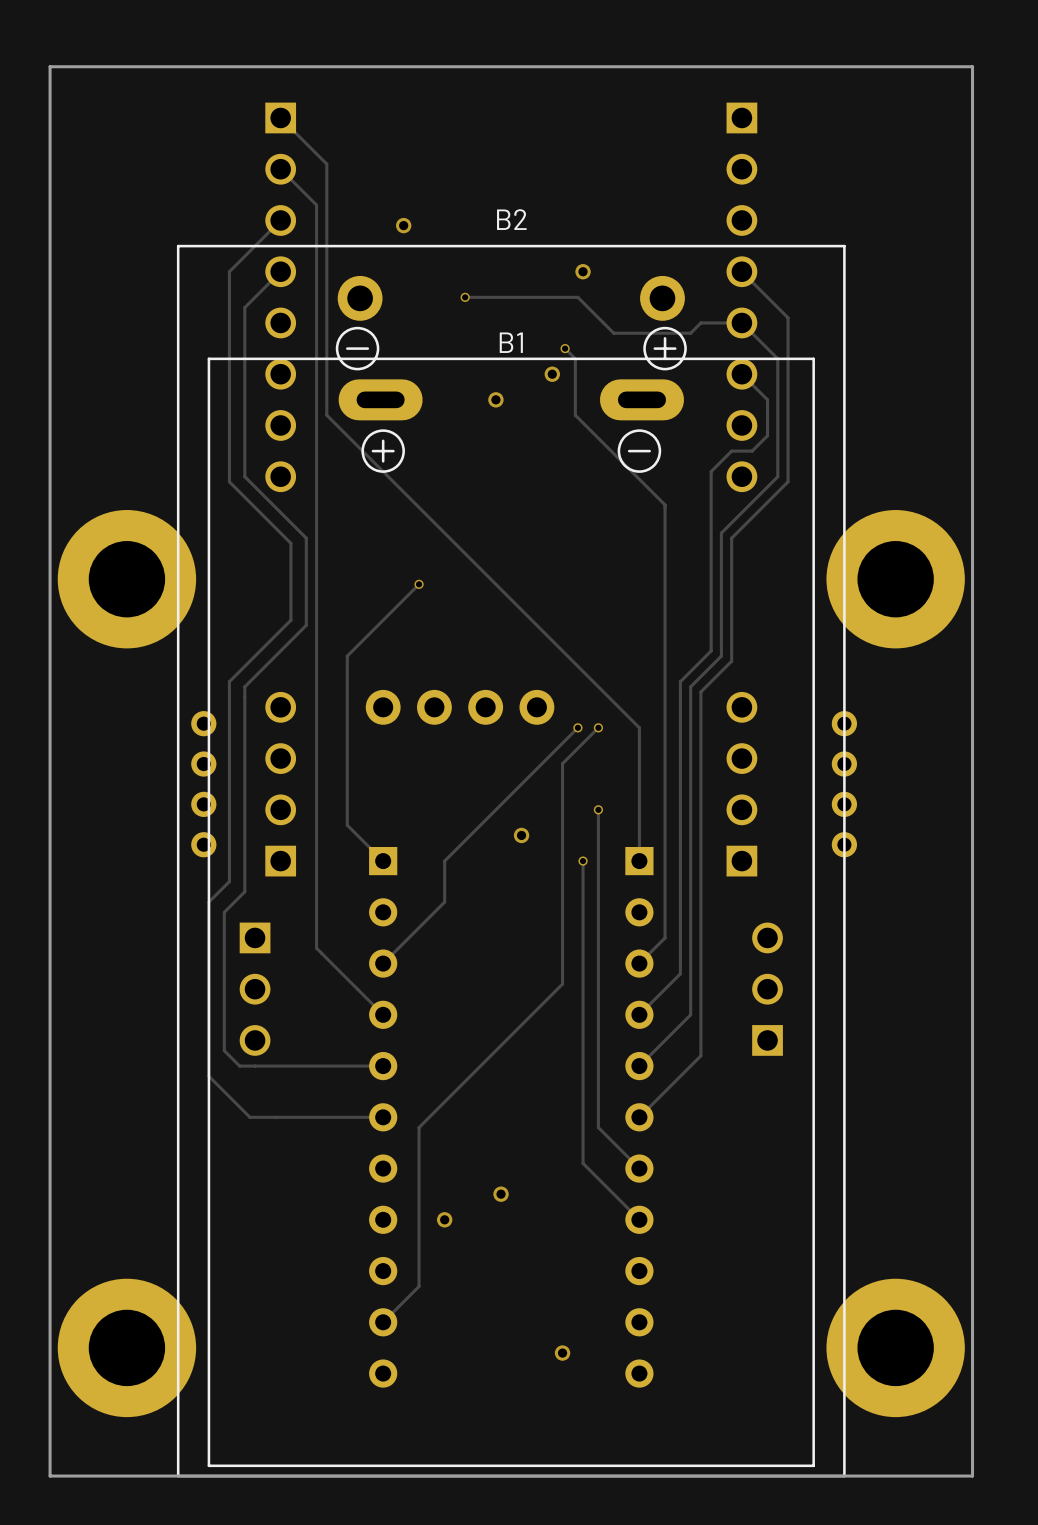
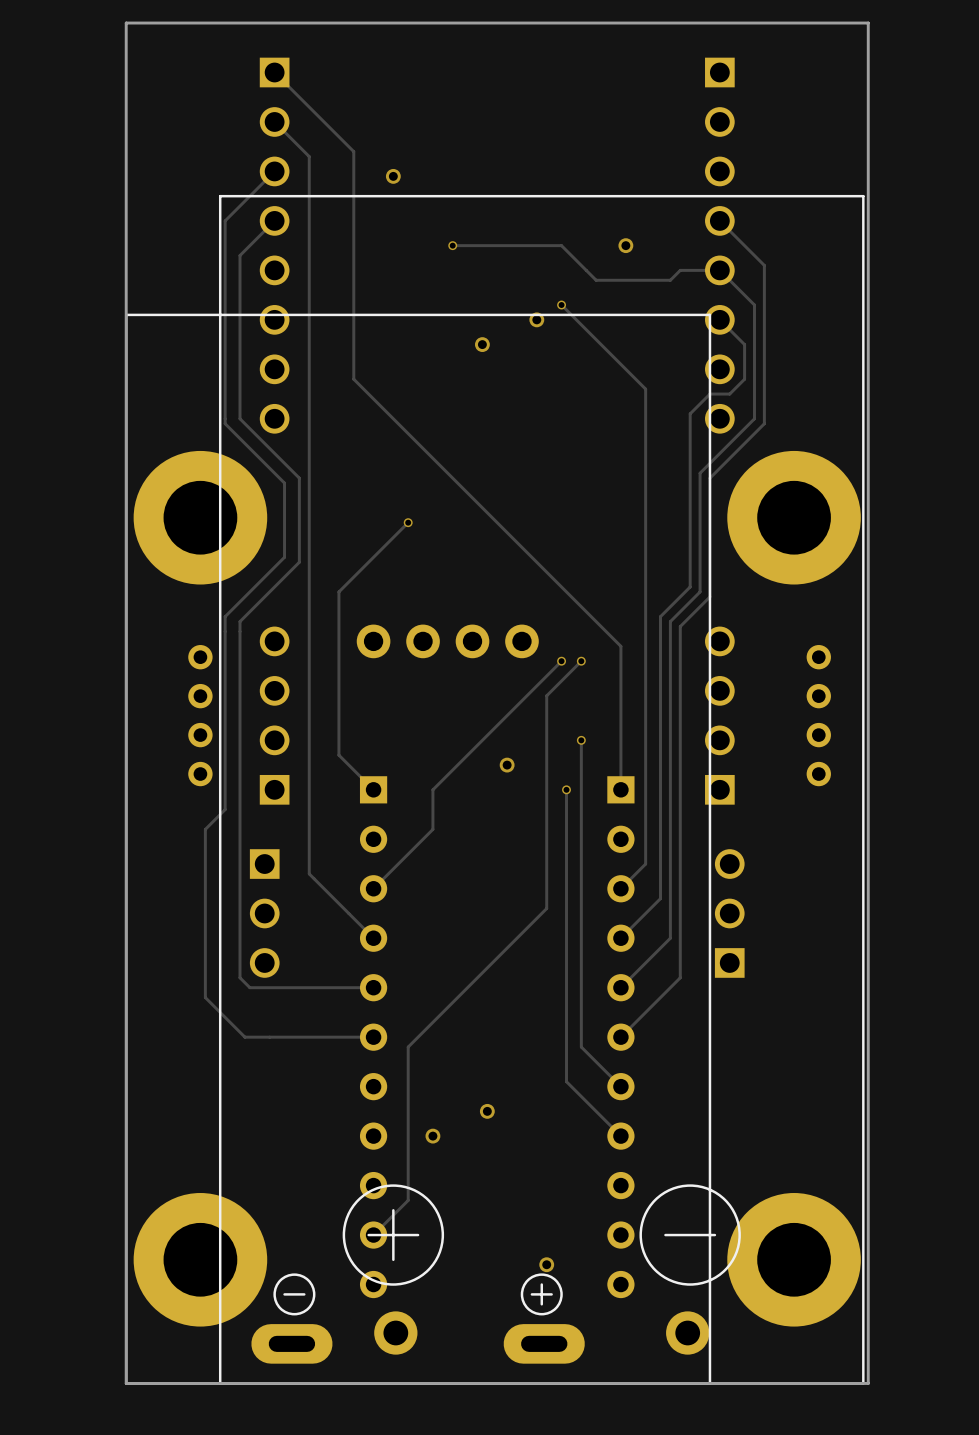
board edge: (126, 66) (50, 66) (50, 1476) (126, 1476) -> (126, 23) (126, 1383)
board edge: (895, 66) (972, 66) (972, 1476) (895, 1476) -> (868, 23) (868, 1383)
track: (326, 164) (326, 415) (639, 727) -> (319, 117) (353, 151) (353, 379) (620, 646) (620, 661)
via position: (583, 271) -> (625, 245)
track: (565, 348) (575, 358) (575, 415) (665, 504) -> (561, 305) (645, 389) (645, 446)
via position: (565, 348) -> (561, 305)
part position: (126, 579) -> (200, 517)
part position: (895, 579) -> (794, 517)
B2: (511, 861) -> none
part: none -> (541, 789)
track: (244, 891) (224, 912) (224, 1050) (239, 1066) (255, 1066) -> (240, 819) (240, 977) (249, 987)
B1: (511, 912) -> none
part: none -> (418, 849)
part position: (255, 989) -> (264, 913)
part position: (767, 989) -> (729, 913)
part position: (126, 1347) -> (200, 1259)
part position: (895, 1347) -> (794, 1259)

